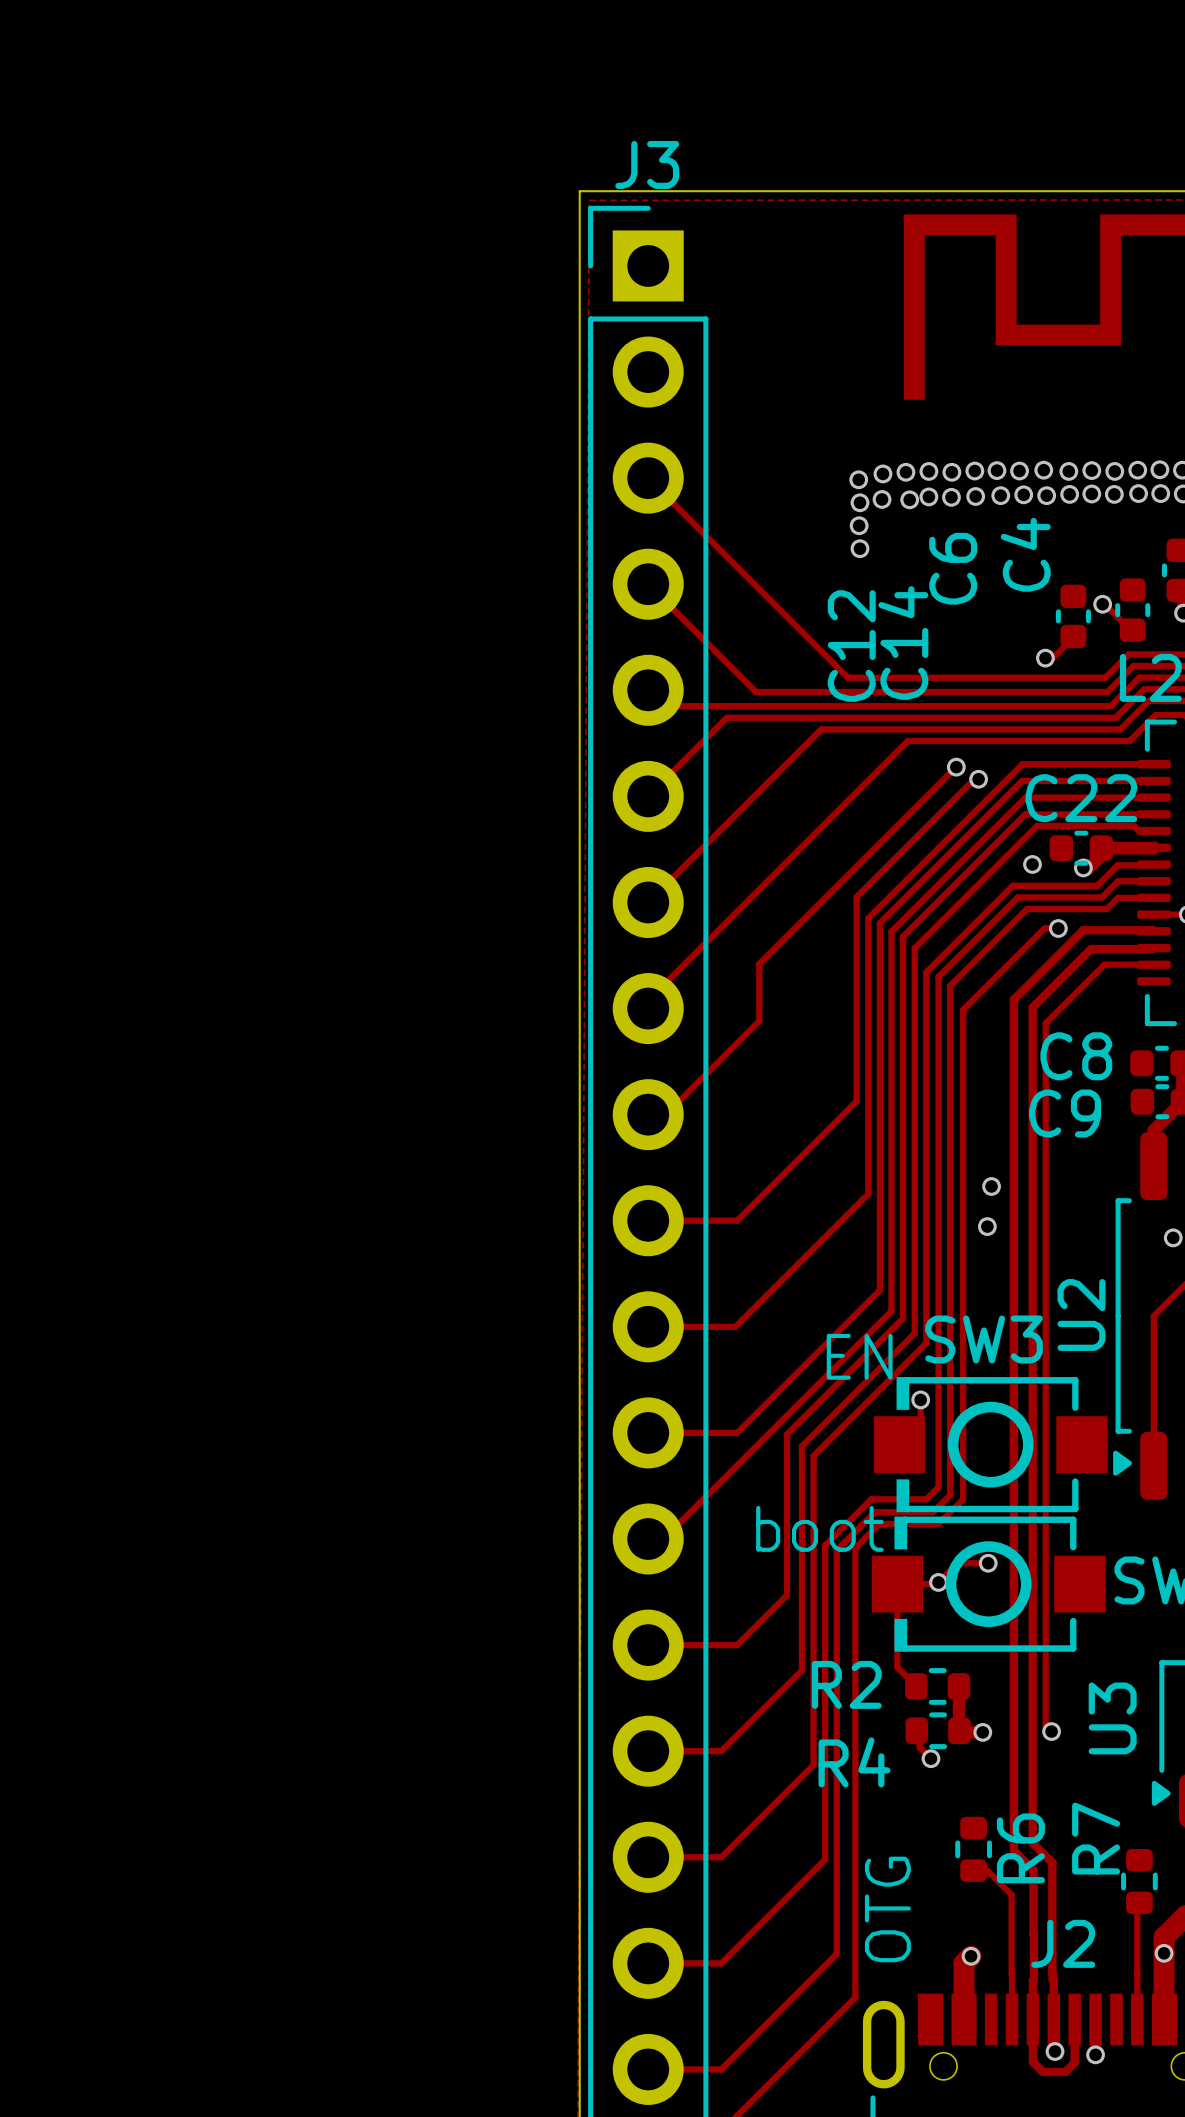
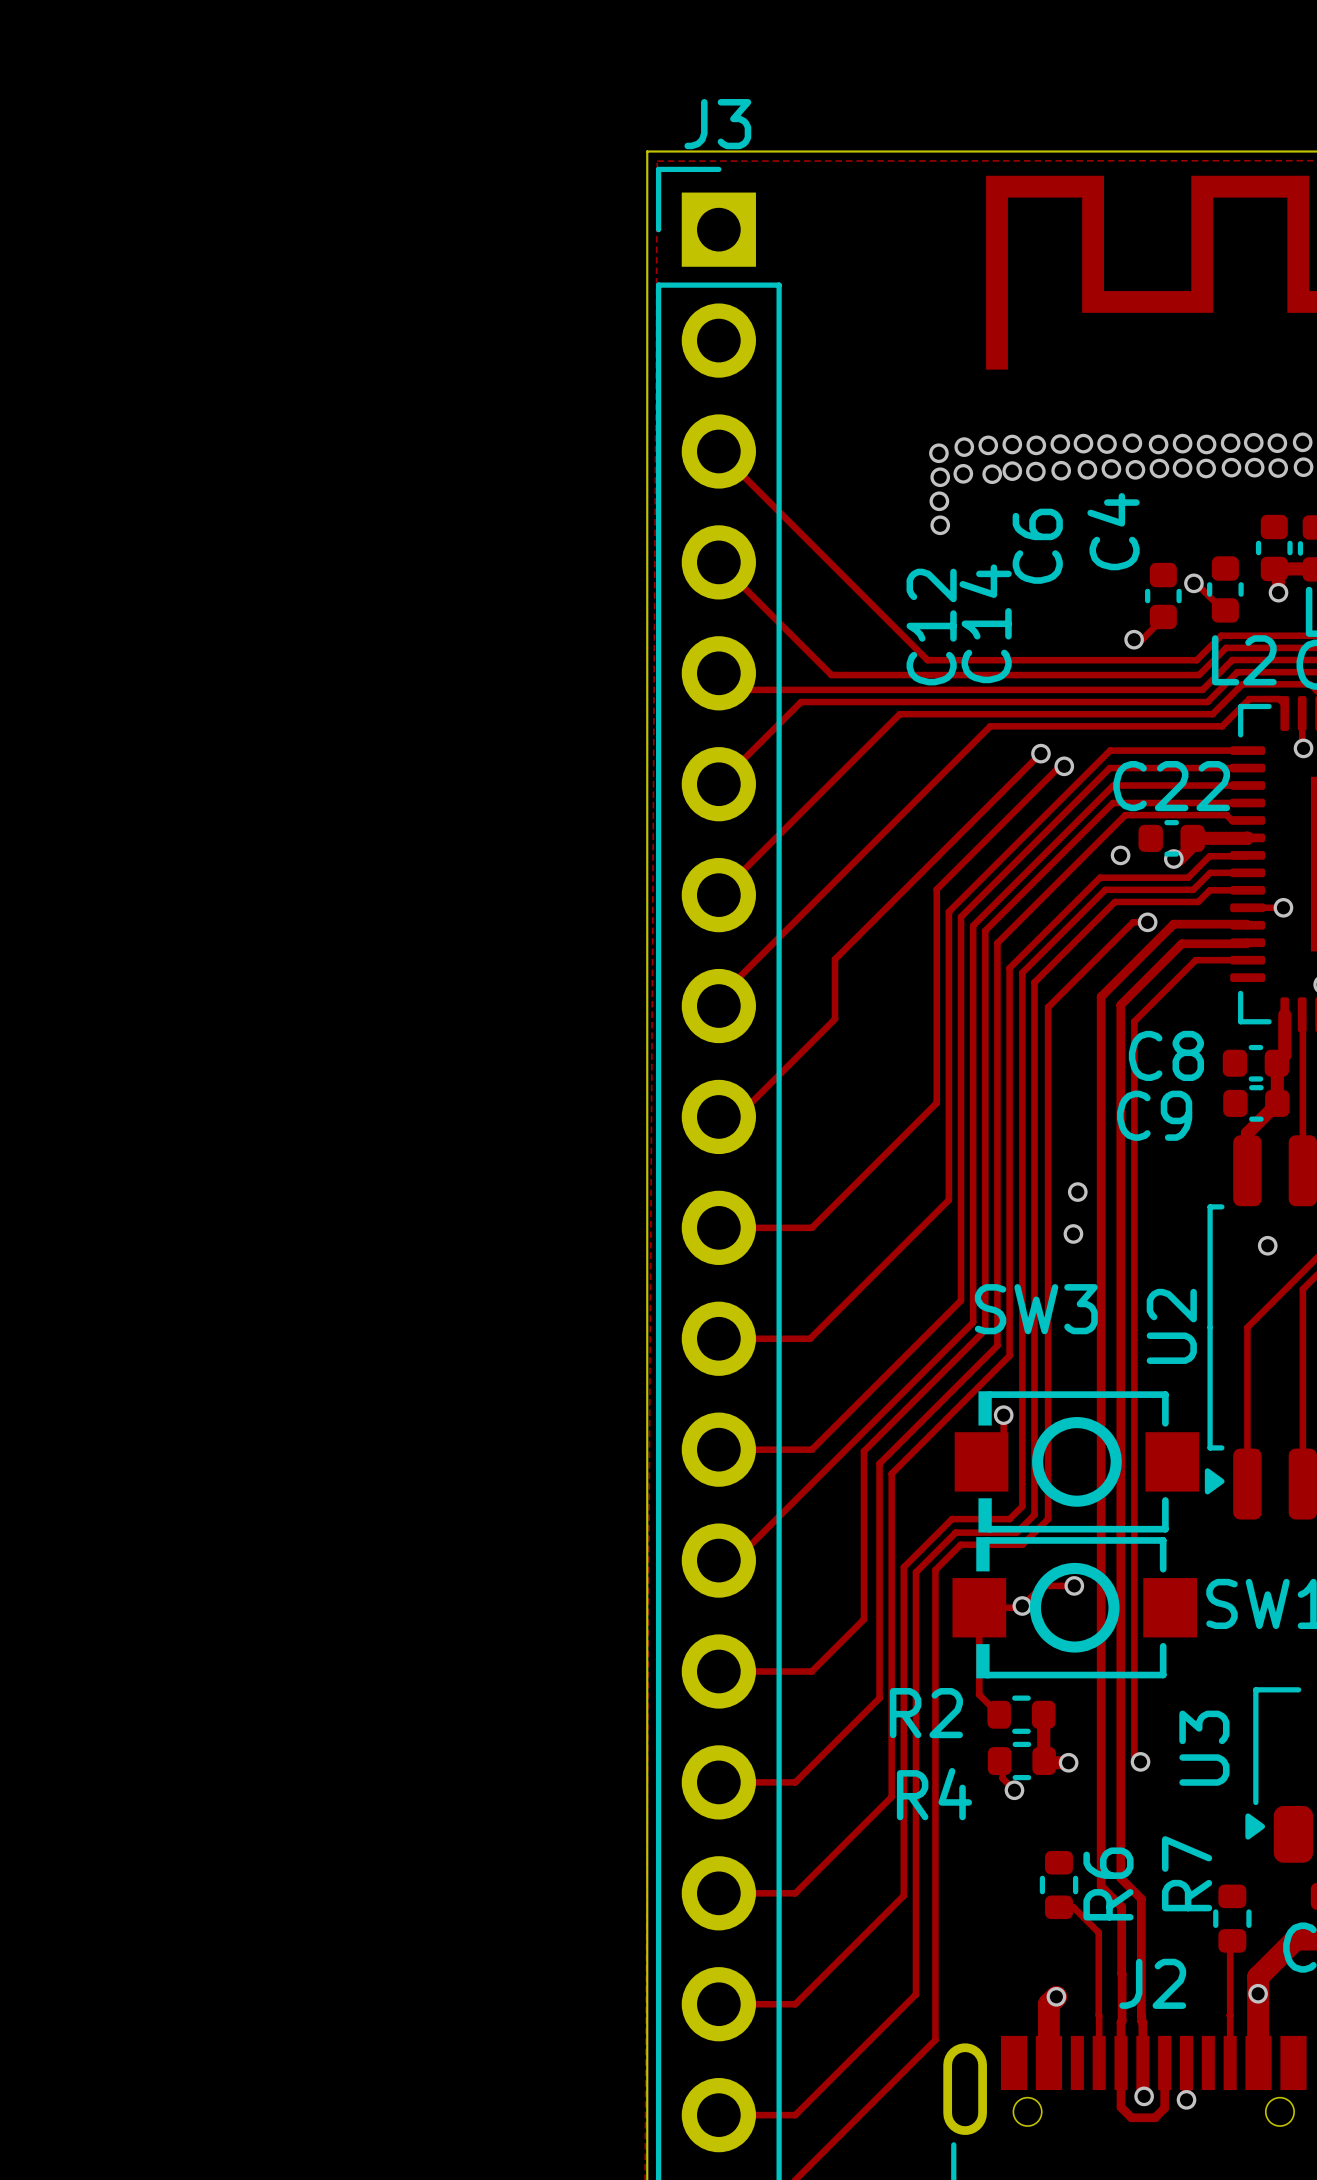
SW3 name position: SW3 (984, 1339) -> SW3 (1036, 1309)
text: EN (859, 1356) -> none
text: boot (819, 1528) -> none
text: OTG (887, 1909) -> none

